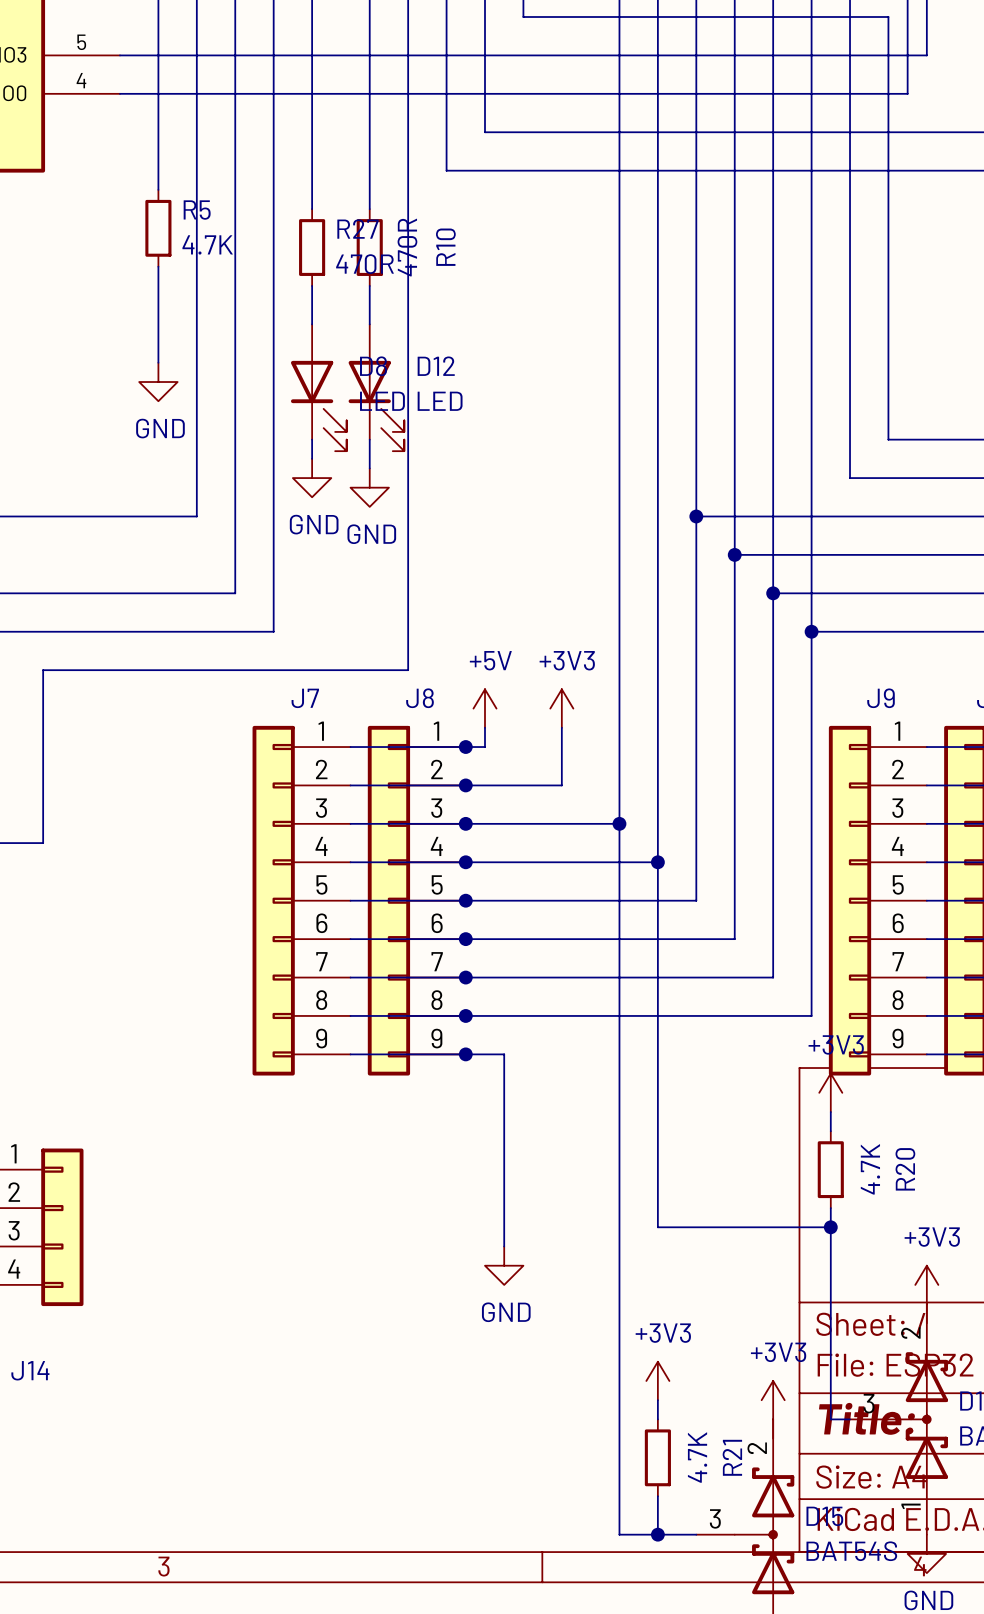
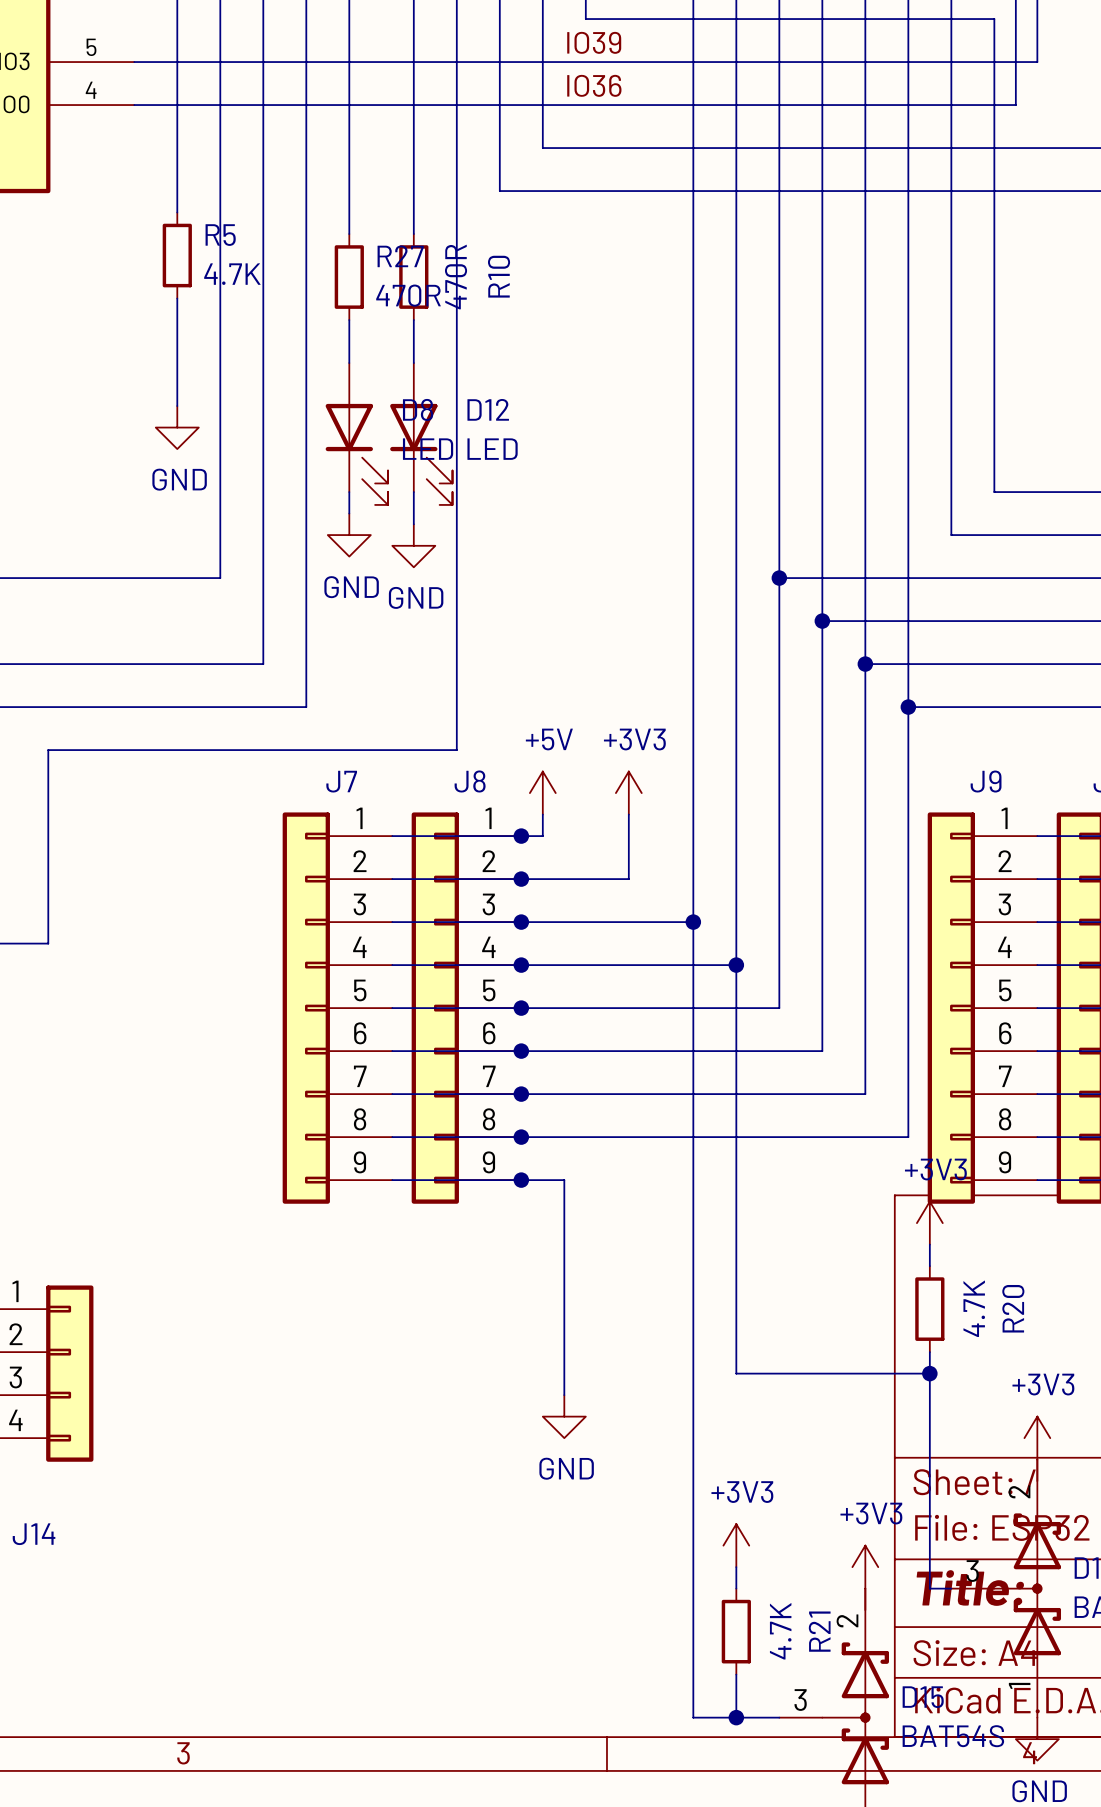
label: none -> IO39 (594, 42)
label: none -> IO36 (594, 85)

